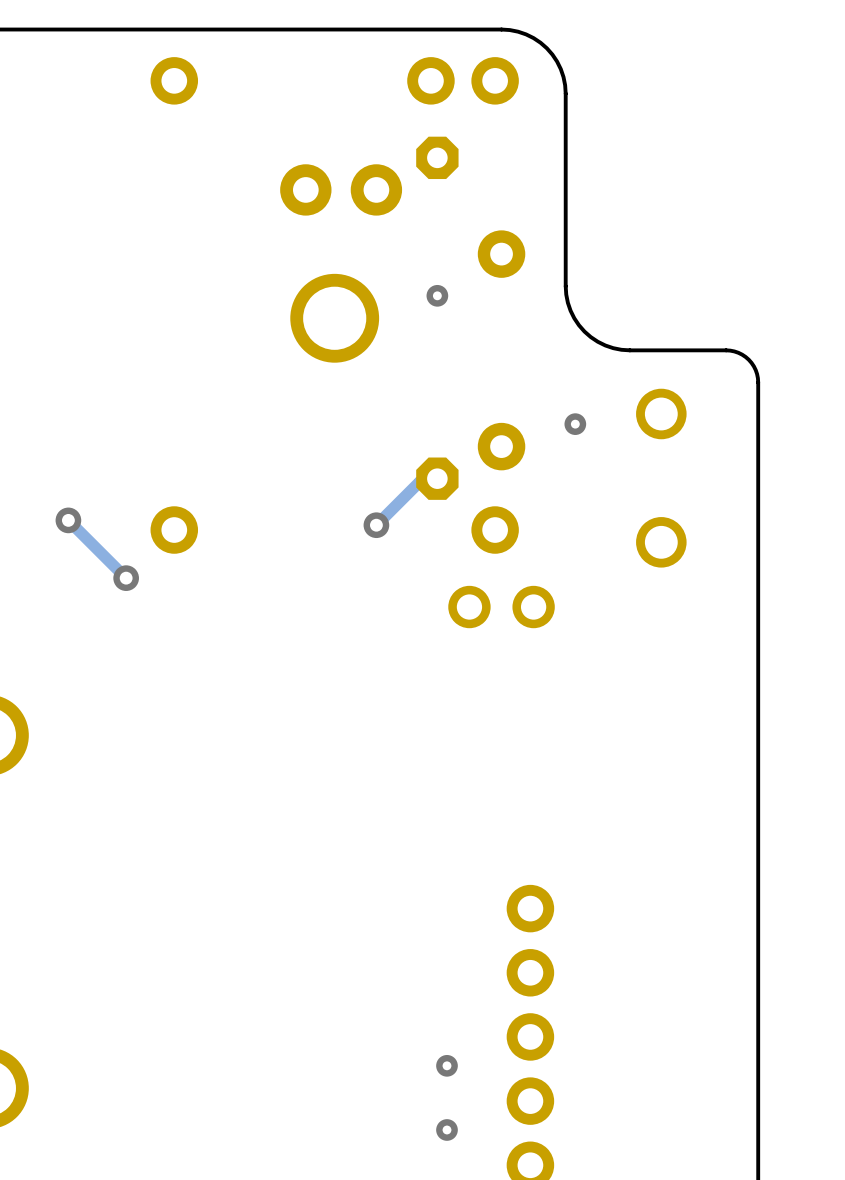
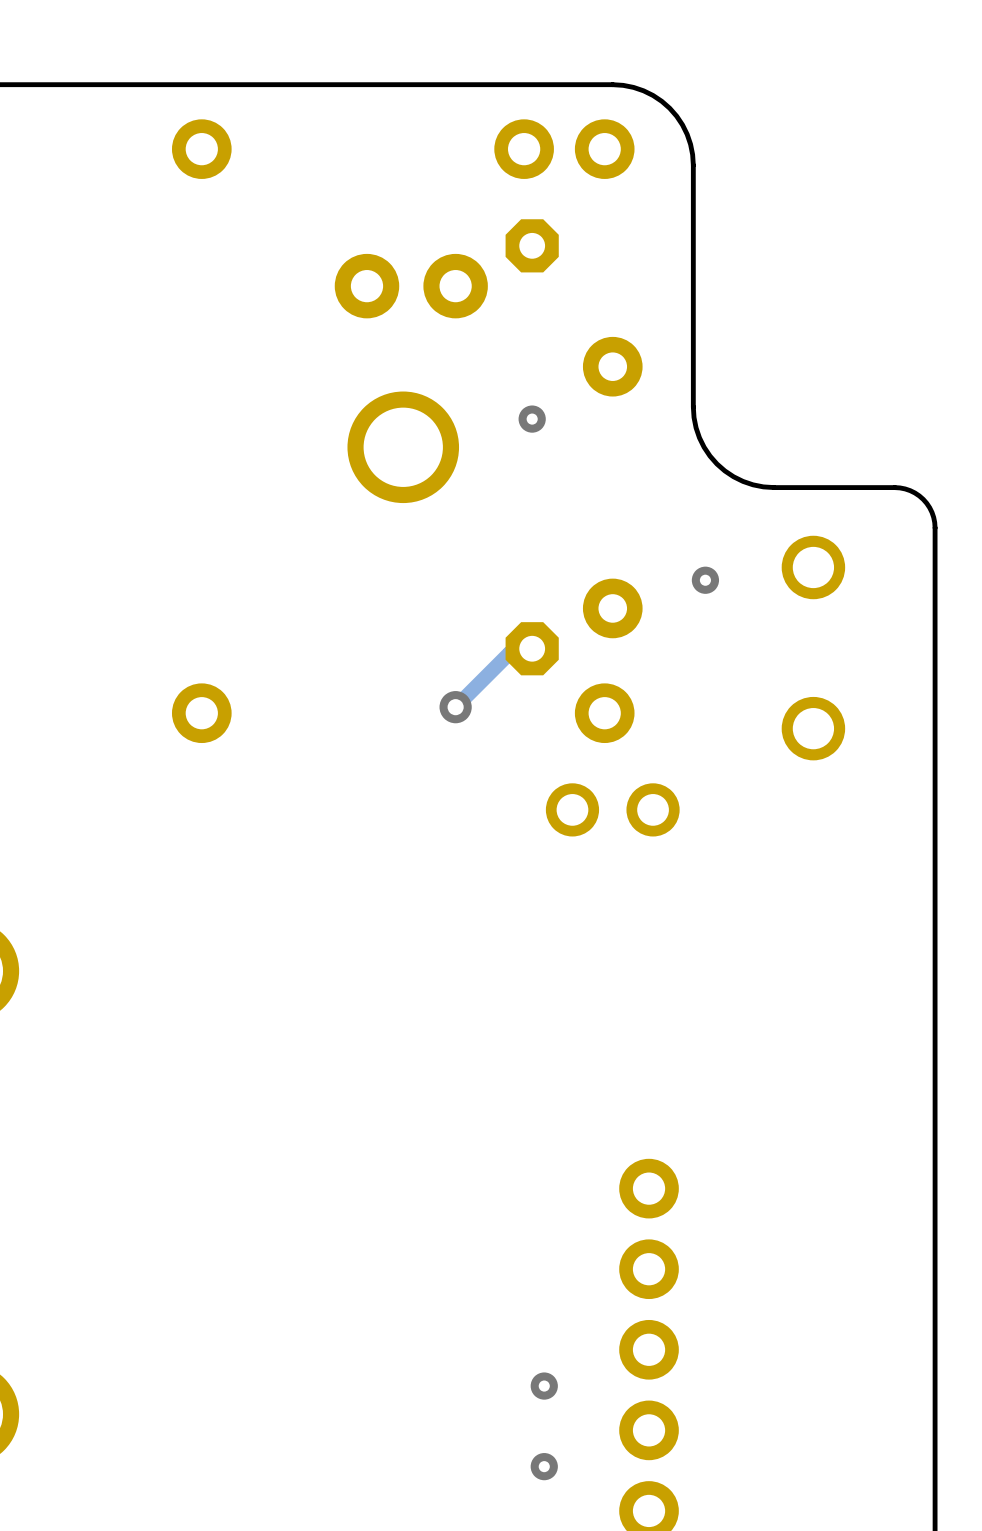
track: (68, 520) (126, 578) -> none
via: (68, 520) -> none
via: (126, 578) -> none

